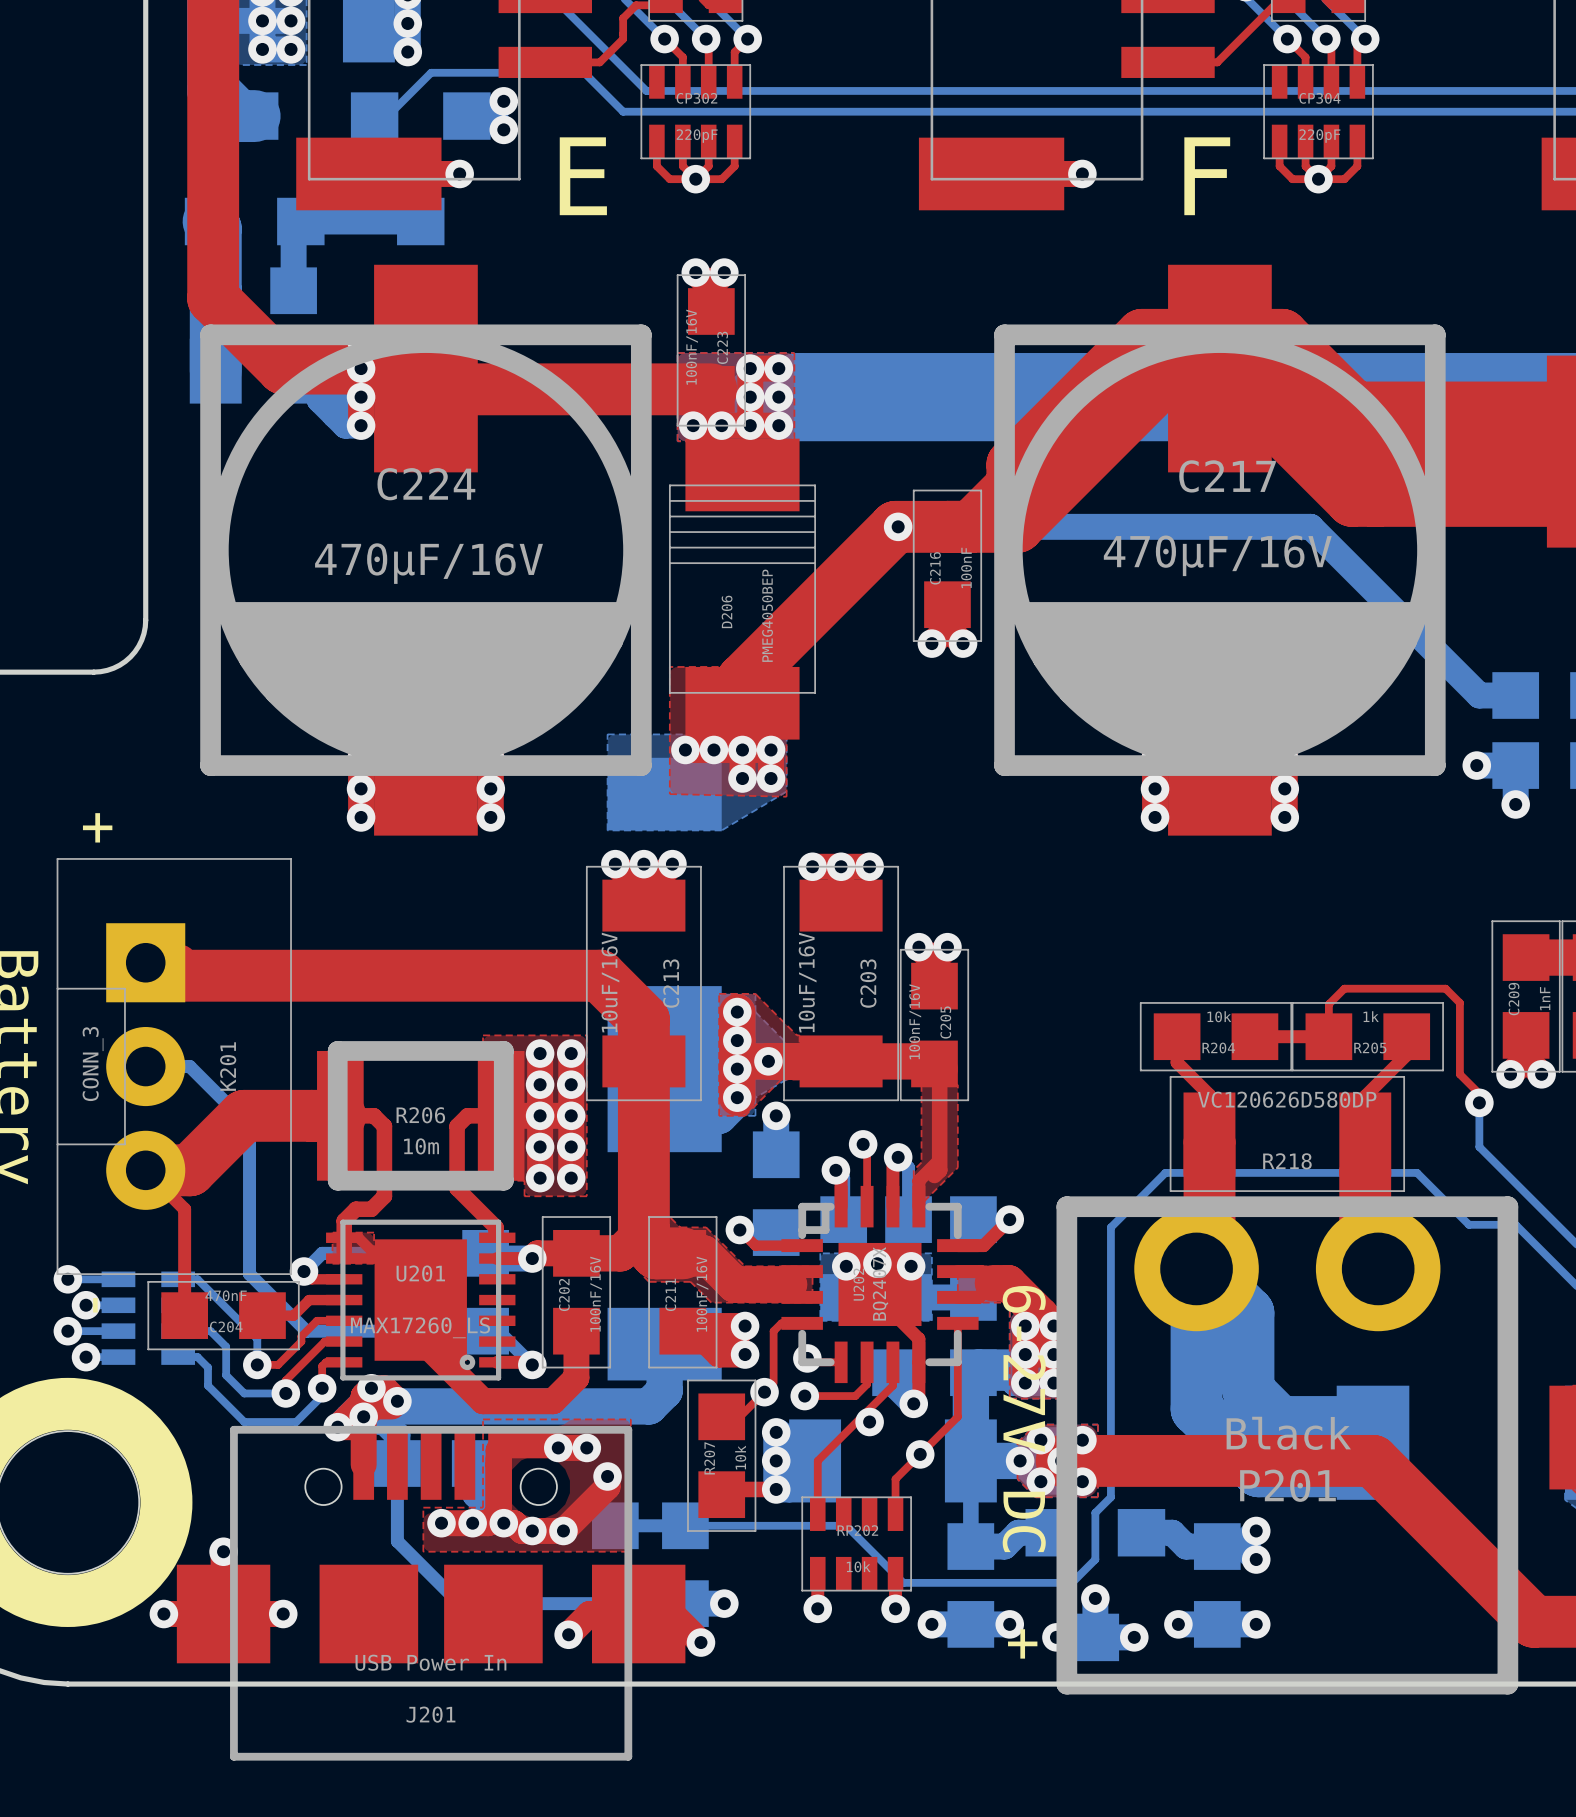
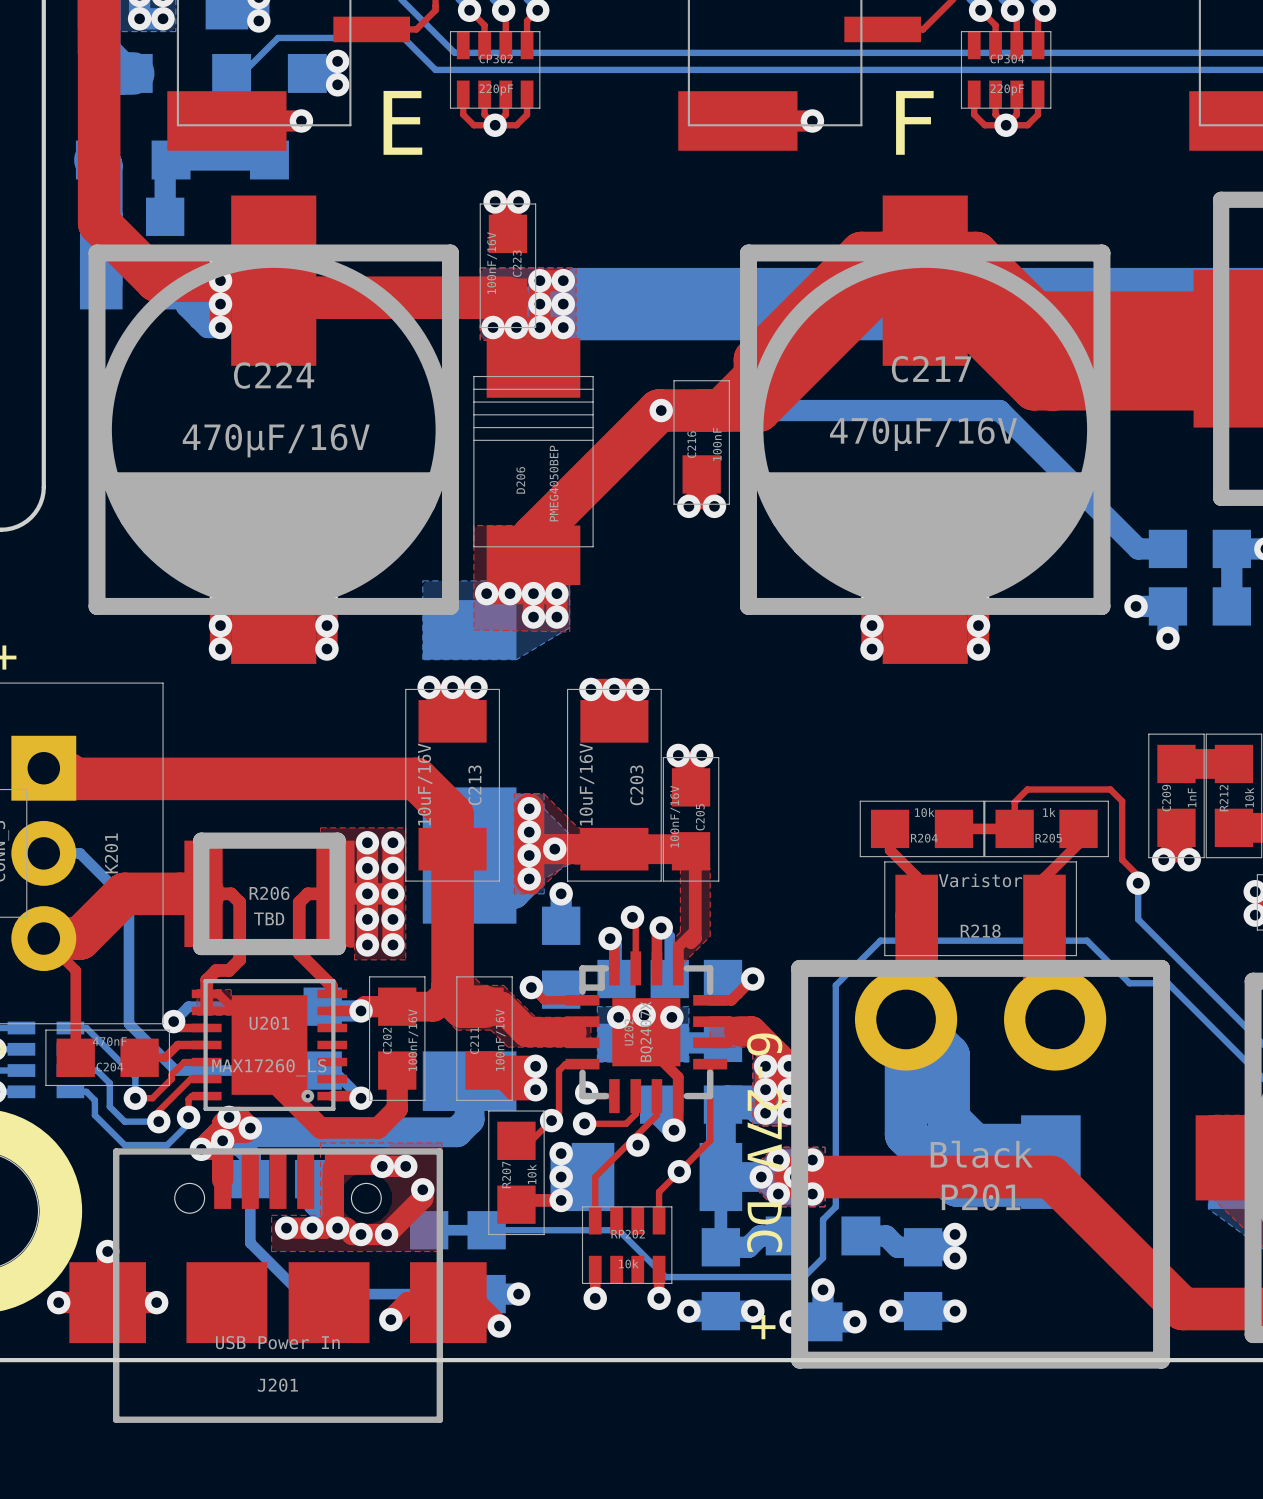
R218 value: VC120626D580DP (1287, 1099) -> Varistor (980, 880)
R206 value: 10m (421, 1146) -> TBD (269, 918)

